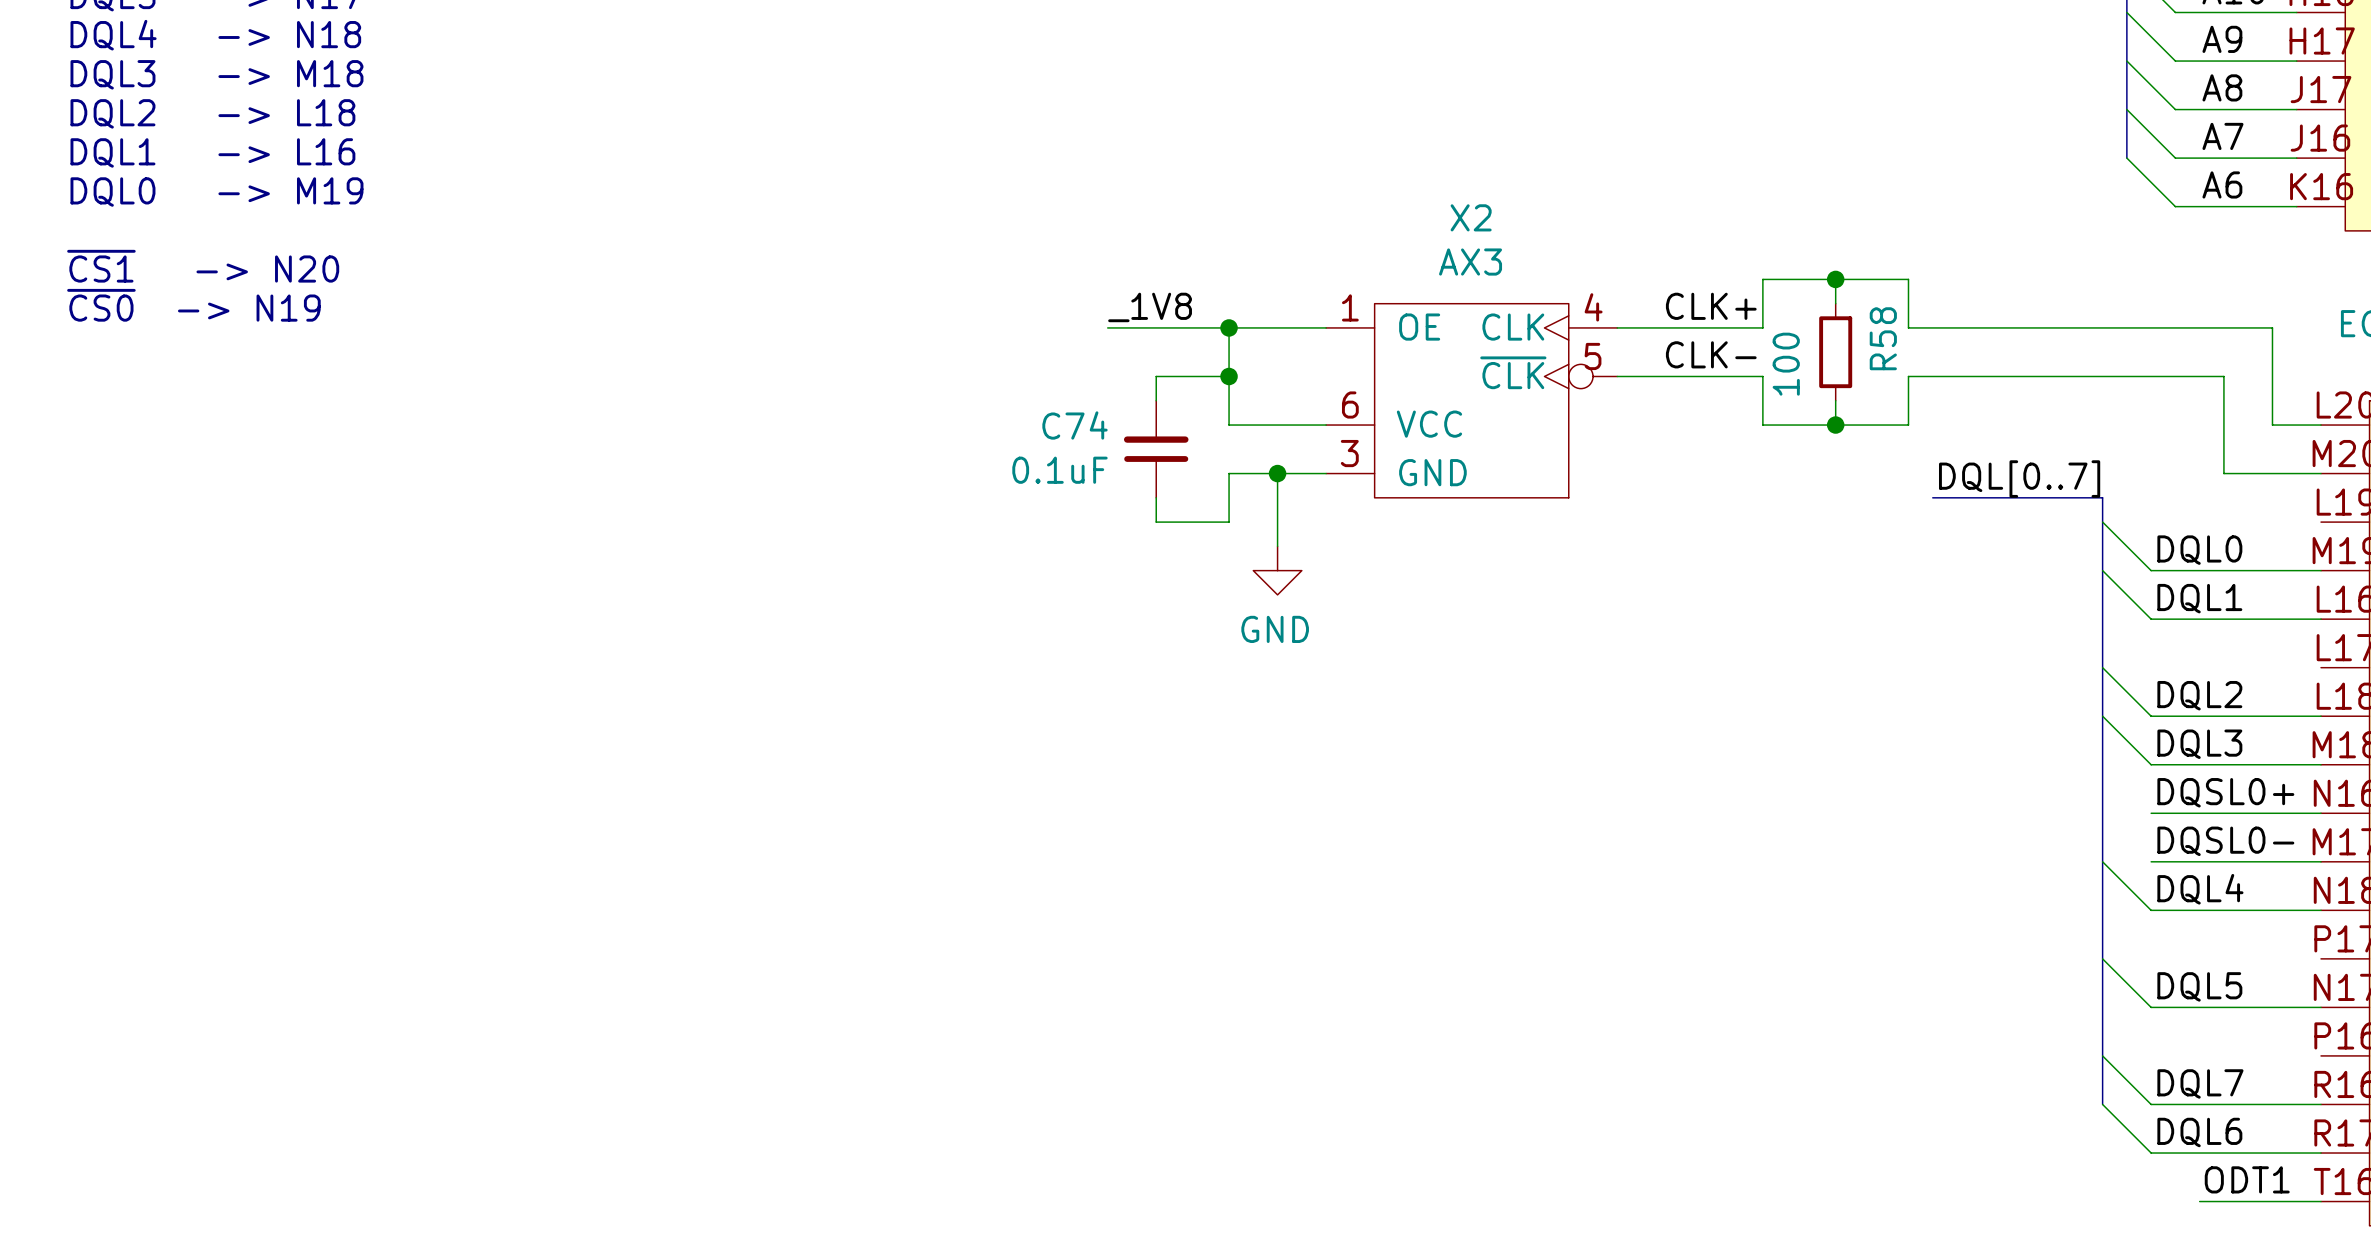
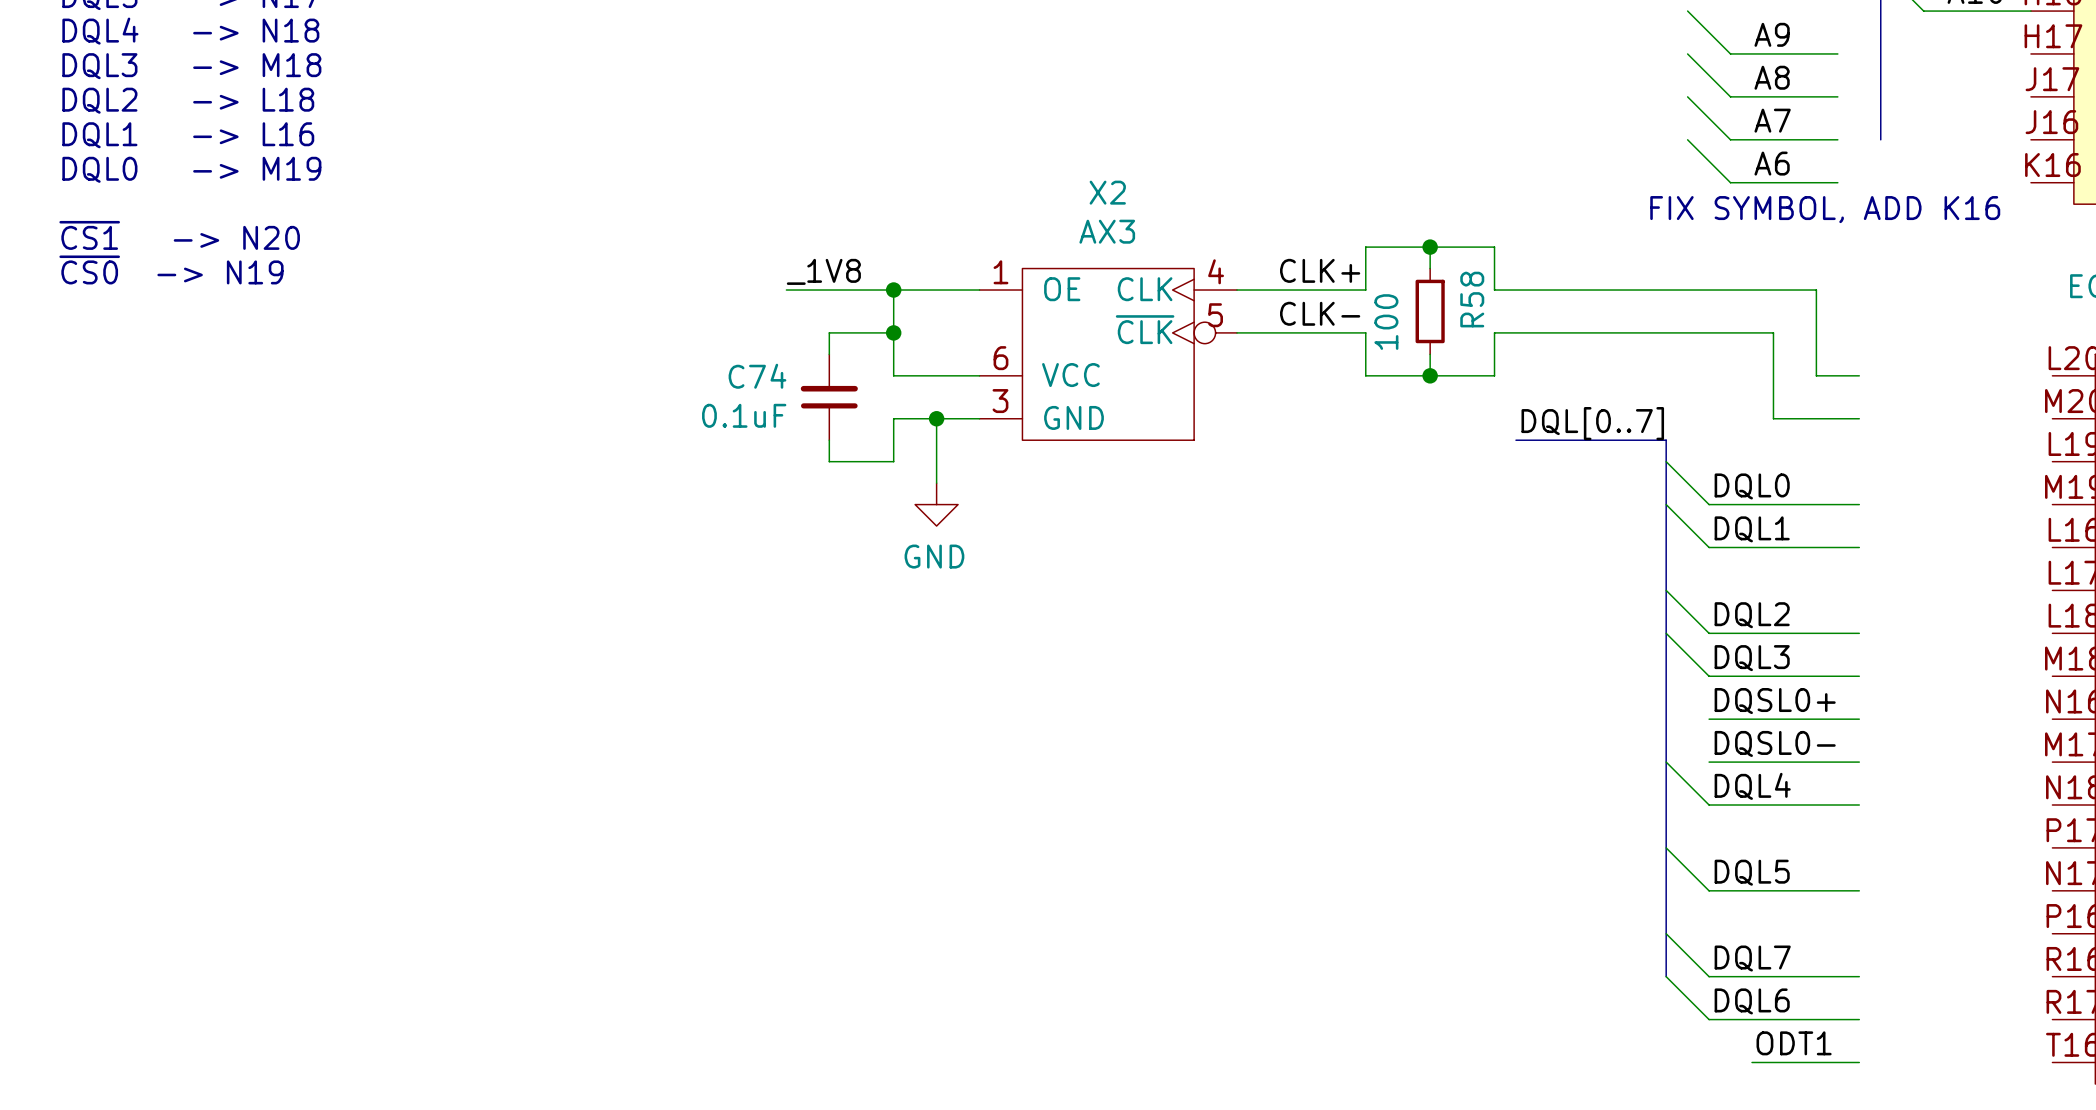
wire: (2126, 12) (2175, 61) (2296, 61) -> (1687, 11) (1730, 53) (1837, 53)
label position: A9 (2222, 39) -> A9 (1772, 34)
wire: (2126, 61) (2175, 109) (2296, 109) -> (1687, 53) (1730, 96) (1837, 96)
label position: A8 (2222, 87) -> A8 (1772, 77)
wire: (2126, 109) (2175, 158) (2296, 158) -> (1687, 96) (1730, 139) (1837, 139)
label position: A7 (2222, 136) -> A7 (1772, 120)
wire: (2126, 158) (2175, 206) (2296, 206) -> (1687, 139) (1730, 182) (1837, 182)
label position: A6 (2222, 184) -> A6 (1772, 163)
text: none -> FIX SYMBOL, ADD K16 (1825, 209)
junction: none -> (1430, 247)
wire: (1835, 279) (1835, 303) -> (1430, 247) (1430, 268)
junction: (1835, 279) -> none
label position: CLK+ (1711, 306) -> CLK+ (1320, 270)
label position: _1V8 (1150, 307) -> _1V8 (823, 271)
junction: none -> (893, 290)
wire: (1107, 327) (1326, 327) -> (979, 290) (786, 290)
wire: (1229, 327) (1229, 425) (1326, 425) -> (893, 290) (893, 375) (979, 375)
junction: (1229, 327) -> none
wire: (1617, 327) (1690, 327) -> (1237, 290) (1365, 290) (1365, 247) (1494, 247) (1494, 290)
wire: (1762, 327) (1762, 279) (1908, 279) (1908, 327) -> (1558, 290) (1687, 290)
wire: (2054, 327) (2272, 327) (2272, 425) (2321, 425) -> (1816, 290) (1816, 375) (1859, 375)
R58 position: (1835, 352) -> (1430, 311)
label position: CLK- (1711, 354) -> CLK- (1320, 313)
junction: none -> (893, 332)
wire: (1229, 376) (1156, 376) (1156, 400) -> (893, 332) (829, 332) (829, 354)
junction: (1229, 376) -> none
wire: (1617, 376) (1690, 376) -> (1237, 332) (1365, 332) (1365, 375) (1494, 375) (1494, 332)
wire: (1762, 376) (1762, 425) (1908, 425) (1908, 376) -> (1558, 332) (1687, 332)
wire: (2005, 376) (2223, 376) (2223, 473) (2321, 473) -> (1773, 332) (1773, 418) (1859, 418)
X2 position: (1471, 400) -> (1108, 354)
wire: (1835, 400) (1835, 425) -> (1430, 354) (1430, 375)
junction: none -> (1430, 375)
junction: (1835, 425) -> none
C74 position: (1156, 449) -> (829, 397)
junction: none -> (936, 418)
wire: (1277, 473) (1277, 546) -> (936, 418) (936, 483)
junction: (1277, 473) -> none
wire: (1326, 473) (1229, 473) (1229, 522) (1156, 522) (1156, 497) -> (979, 418) (893, 418) (893, 461) (829, 461) (829, 440)
label position: DQL[0..7] (2019, 479) -> DQL[0..7] (1592, 423)
bus: (1932, 497) (2102, 497) (2102, 1104) -> (1515, 440) (1666, 440) (1666, 976)
wire: (2102, 522) (2151, 570) (2321, 570) -> (1666, 504) (1709, 547) (1859, 547)
label position: DQL0 (2199, 550) -> DQL0 (1752, 486)
power symbol position: GND (1277, 570) -> GND (936, 504)
wire: (2102, 570) (2151, 619) (2321, 619) -> (1859, 504) (1709, 504) (1666, 461)
label position: DQL1 (2199, 598) -> DQL1 (1752, 529)
wire: (2102, 667) (2151, 716) (2321, 716) -> (1666, 633) (1709, 676) (1859, 676)
label position: DQL2 (2199, 695) -> DQL2 (1752, 615)
wire: (2102, 716) (2151, 764) (2321, 764) -> (1859, 633) (1709, 633) (1666, 590)
label position: DQL3 (2199, 744) -> DQL3 (1752, 658)
label position: DQSL0+ (2225, 792) -> DQSL0+ (1775, 701)
wire: (2151, 813) (2321, 813) -> (1709, 719) (1859, 719)
label position: DQSL0- (2225, 841) -> DQSL0- (1775, 743)
wire: none -> (1666, 762) (1709, 805) (1859, 805)
wire: (2102, 861) (2151, 910) (2321, 910) -> (1859, 762) (1709, 762)
wire: (2151, 861) (2321, 861) -> none
label position: DQL4 (2200, 889) -> DQL4 (1752, 786)
wire: (2102, 958) (2151, 1007) (2321, 1007) -> (1666, 847) (1709, 890) (1859, 890)
label position: DQL5 (2199, 986) -> DQL5 (1752, 872)
wire: (2102, 1055) (2151, 1104) (2321, 1104) -> (1666, 976) (1709, 1019) (1859, 1019)
label position: DQL7 (2200, 1083) -> DQL7 (1752, 958)
wire: (2102, 1104) (2151, 1153) (2321, 1153) -> (1859, 976) (1709, 976) (1666, 933)
label position: DQL6 (2199, 1132) -> DQL6 (1752, 1001)
label position: ODT1 (2247, 1179) -> ODT1 (1794, 1043)
wire: (2199, 1201) (2321, 1201) -> (1752, 1062) (1859, 1062)

